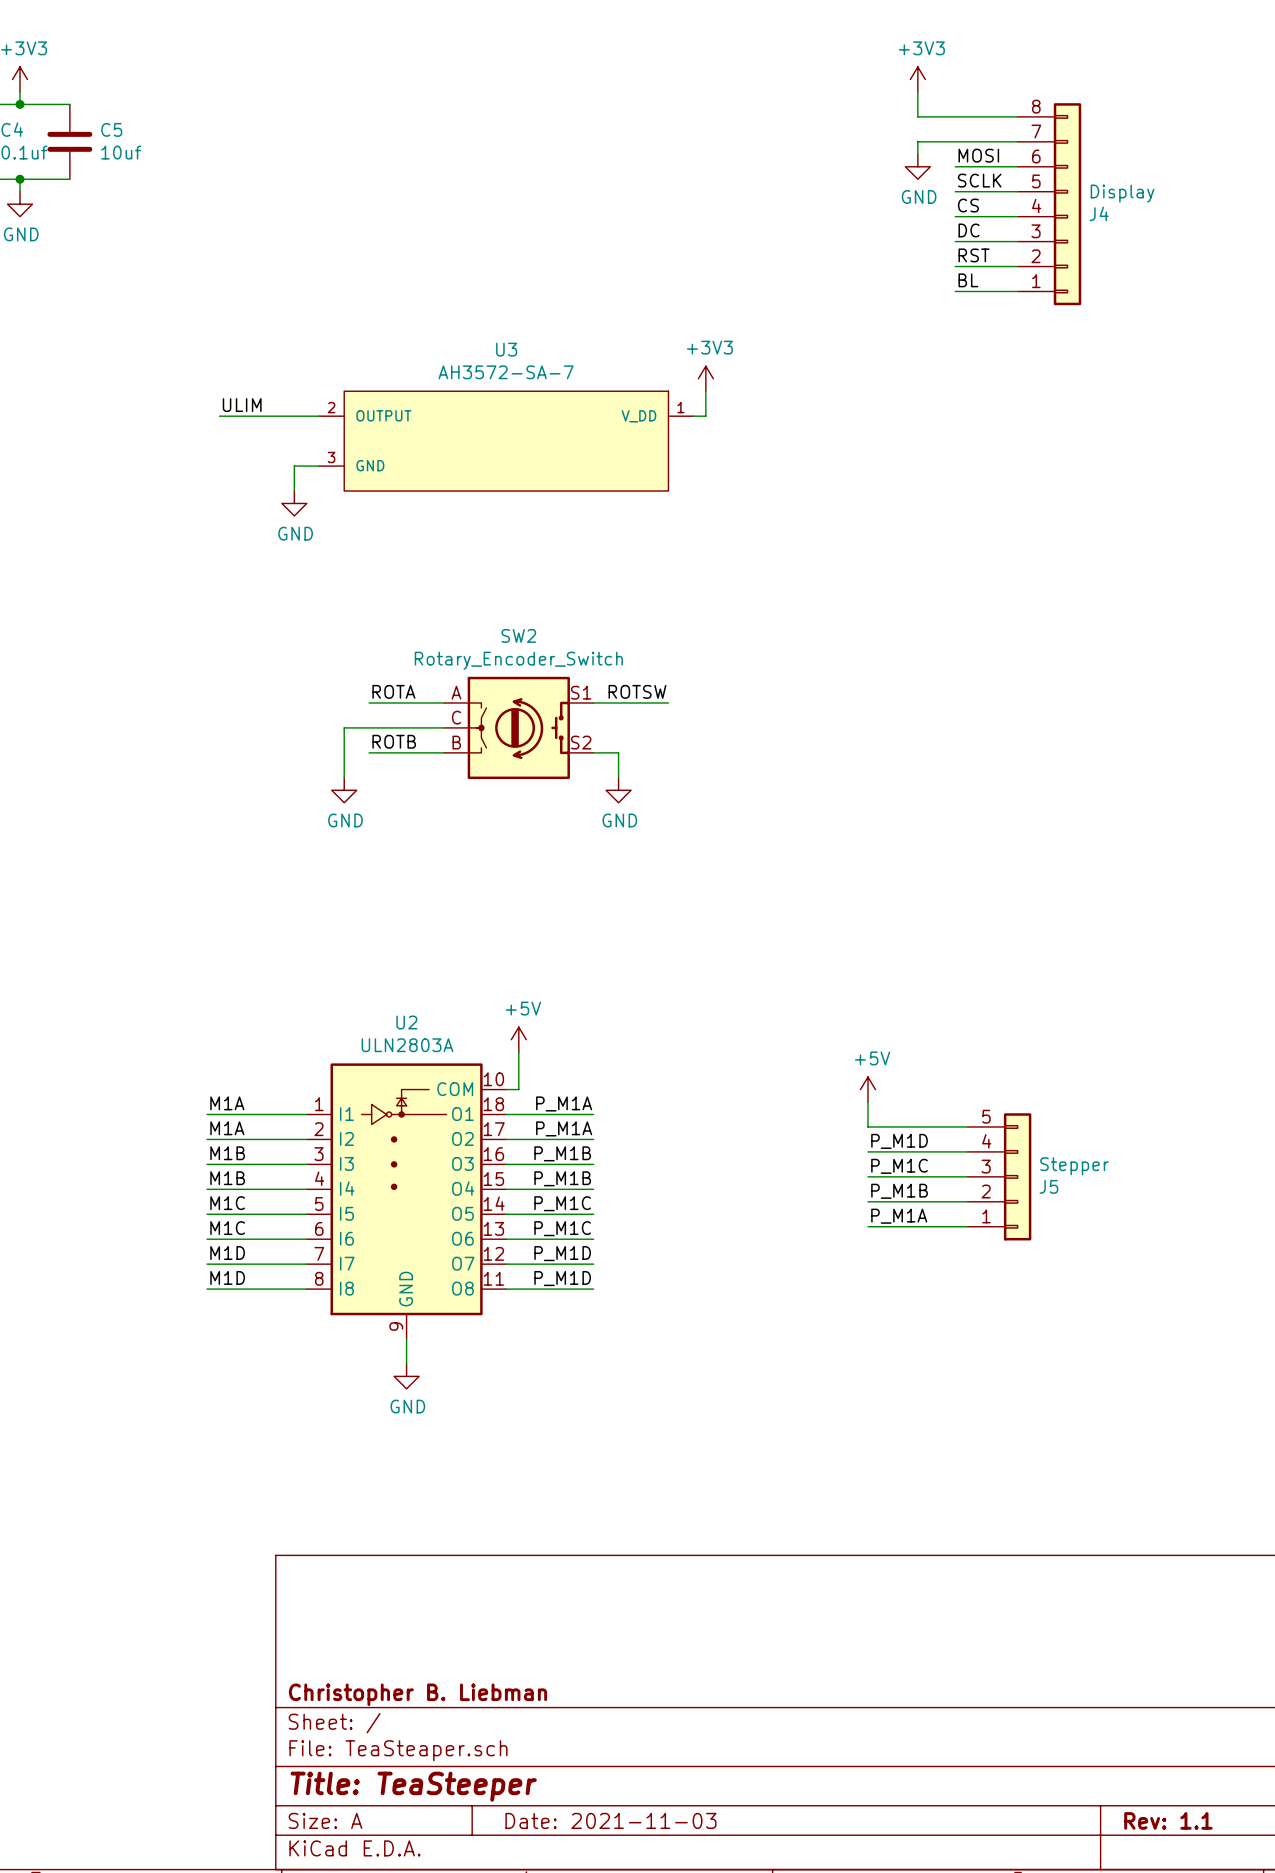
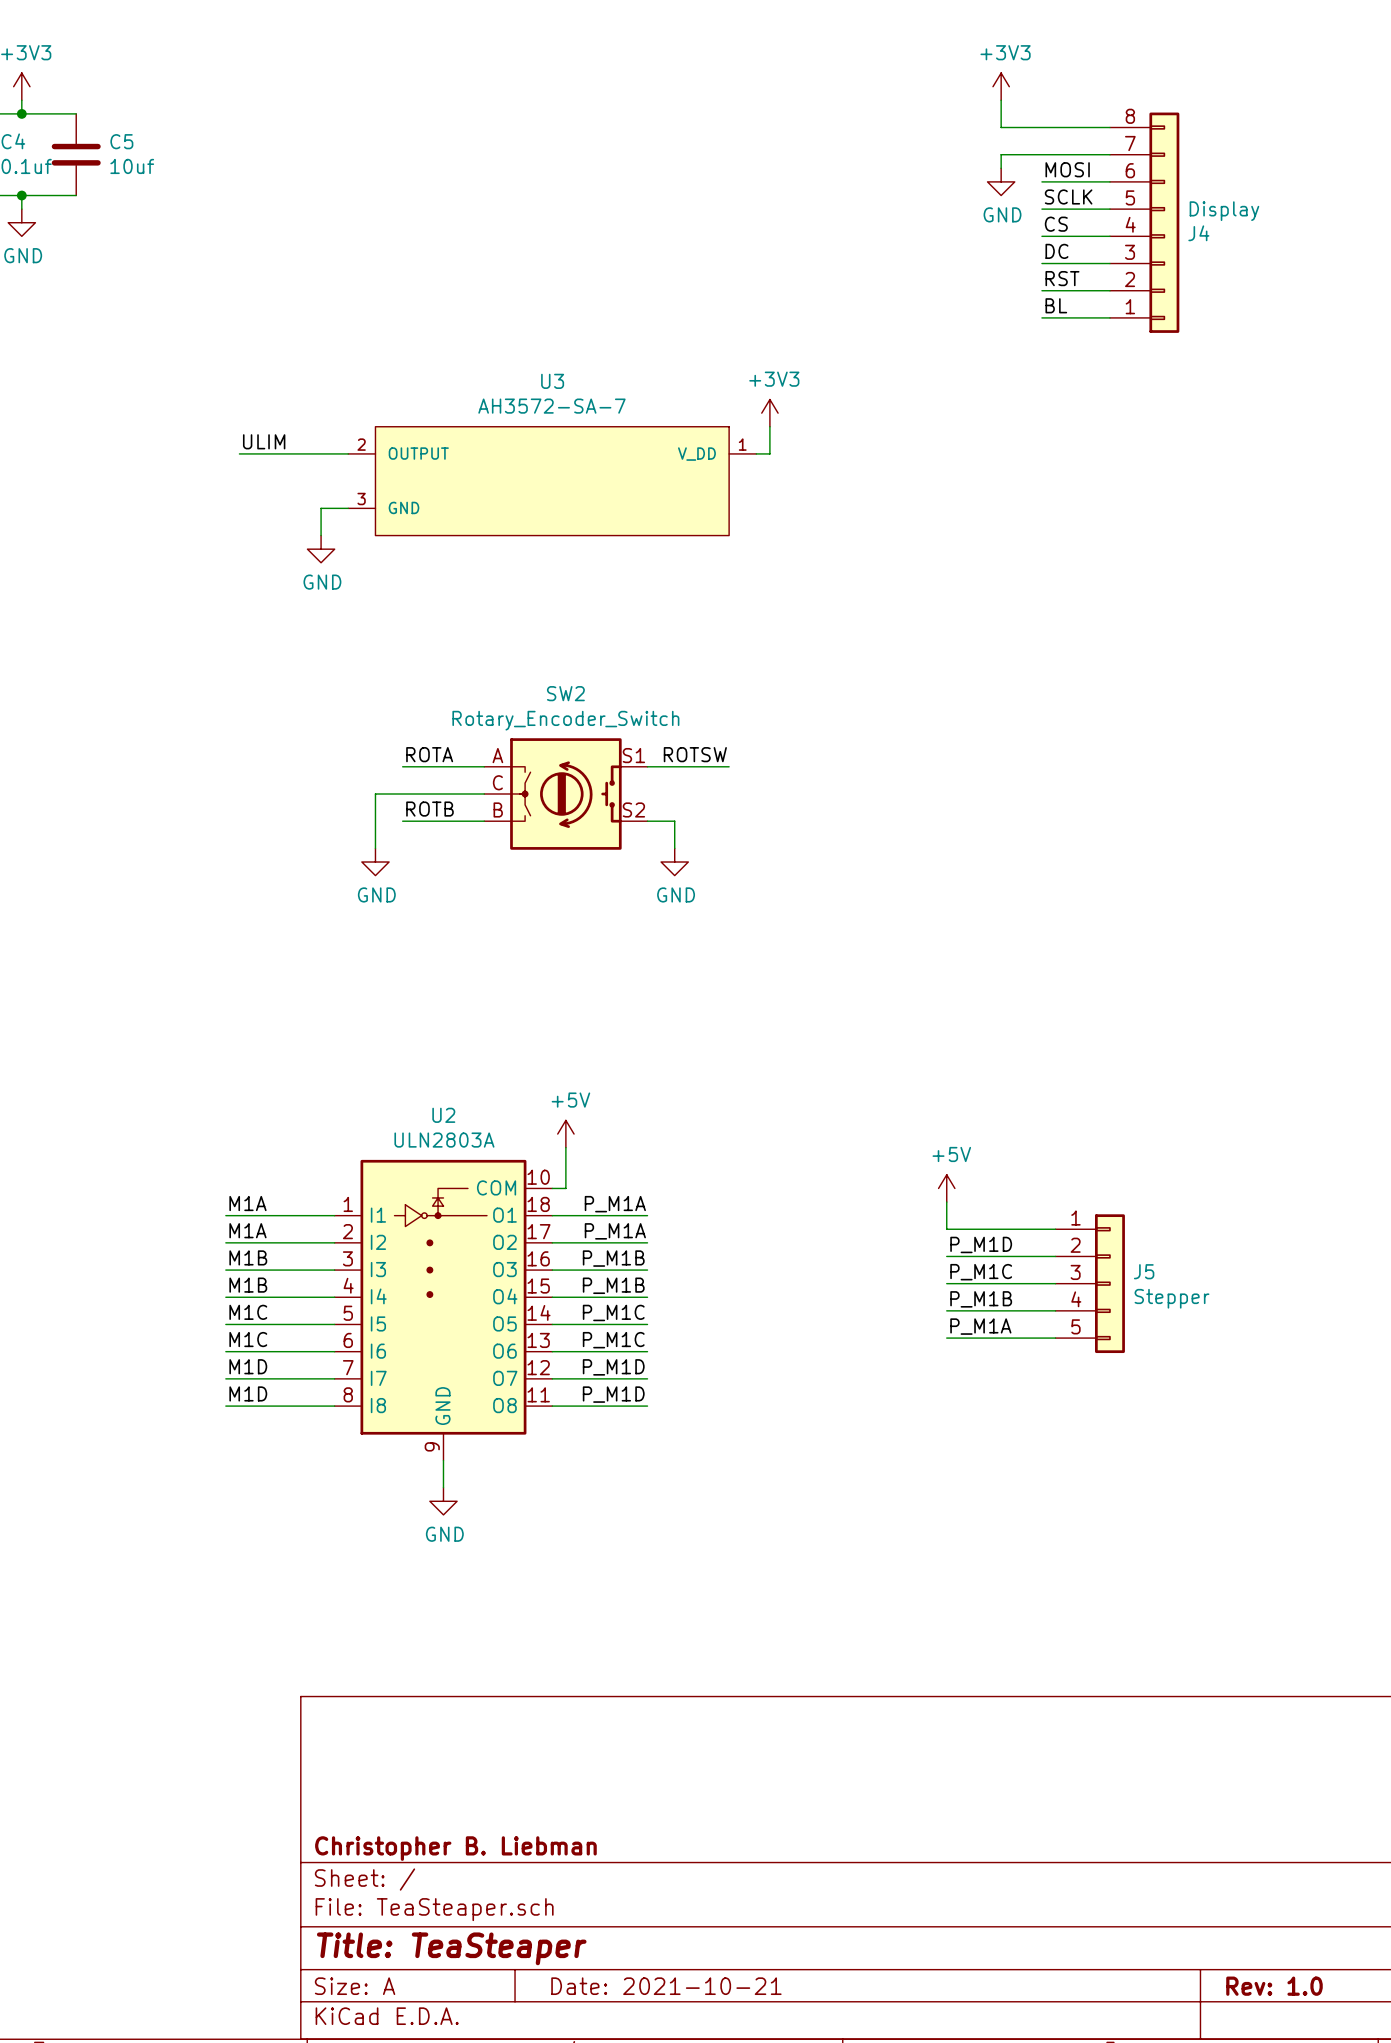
J5 flip: as is (1017, 1176) -> up-down (1109, 1283)
title block: Title: TeaSteeper (413, 1786) -> Title: TeaSteaper (451, 1948)
title block: Date: 2021-11-03 (610, 1820) -> Date: 2021-10-21 (666, 1986)
title block: Rev: 1.1 (1168, 1820) -> Rev: 1.0 (1274, 1986)

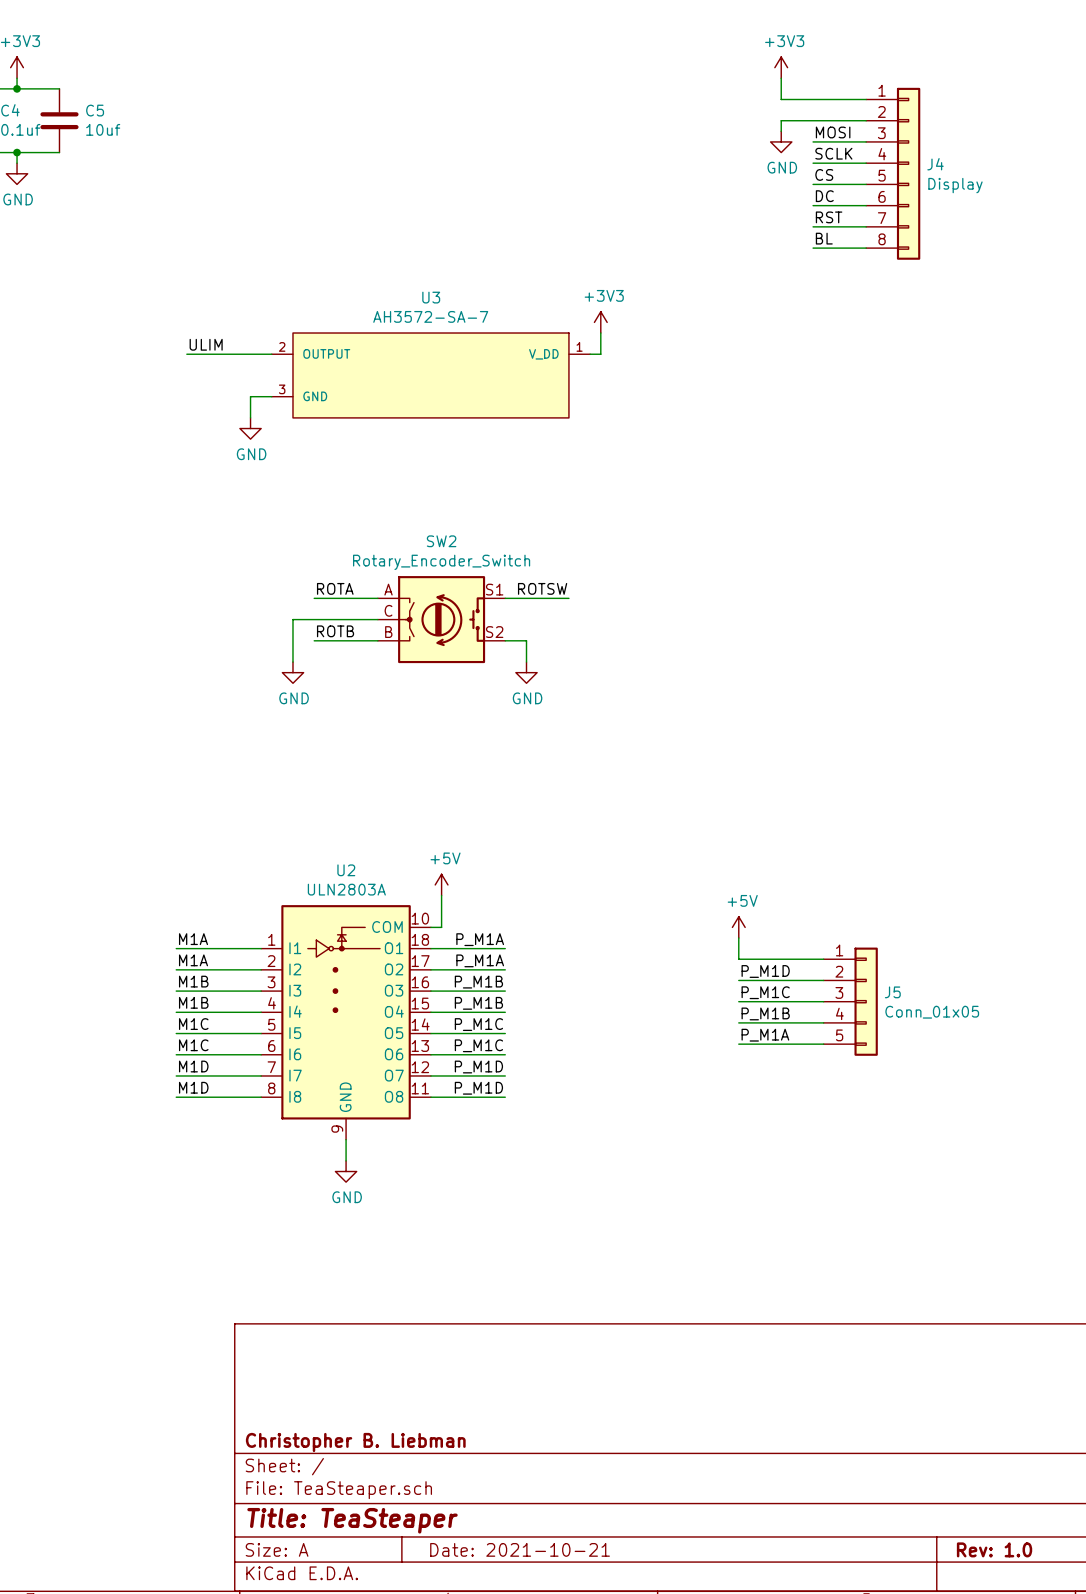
J4 flip: as is (1164, 222) -> up-down (908, 173)
J5 value: Stepper (1171, 1298) -> Conn_01x05 (932, 1012)

